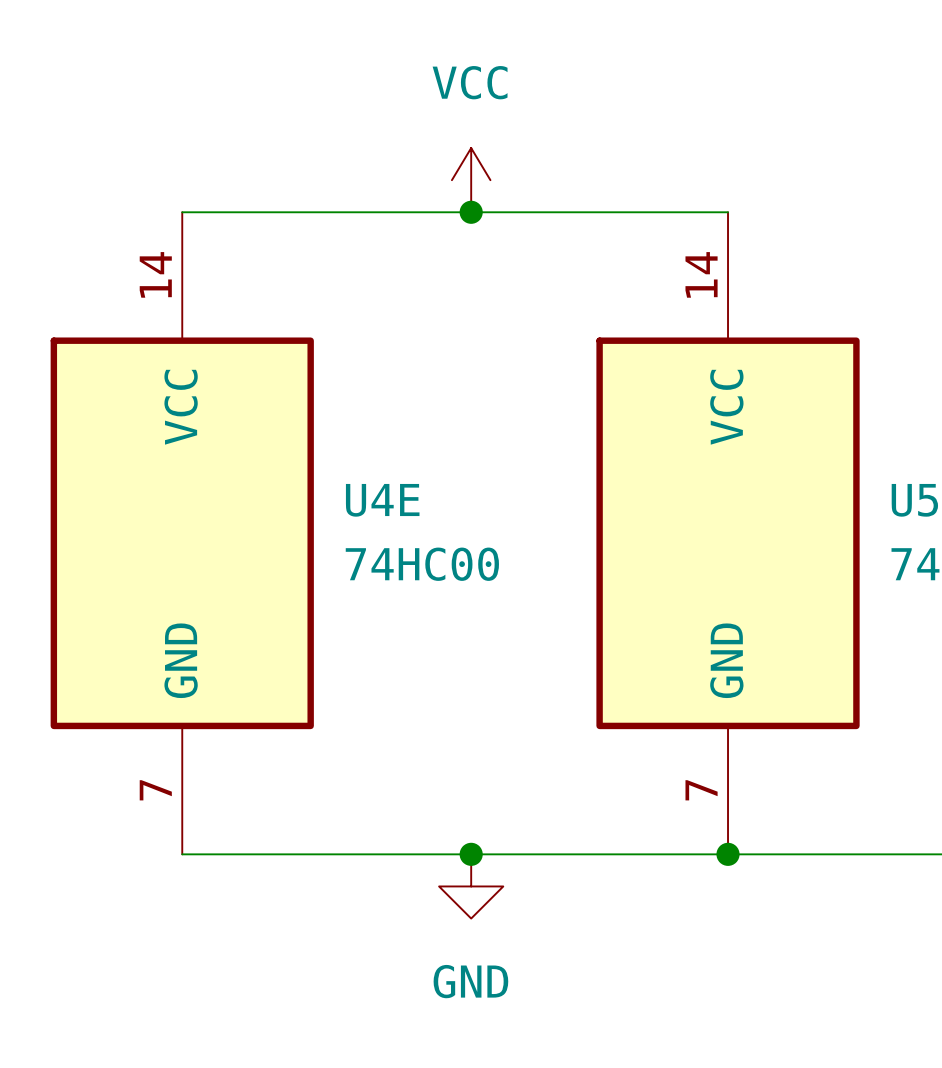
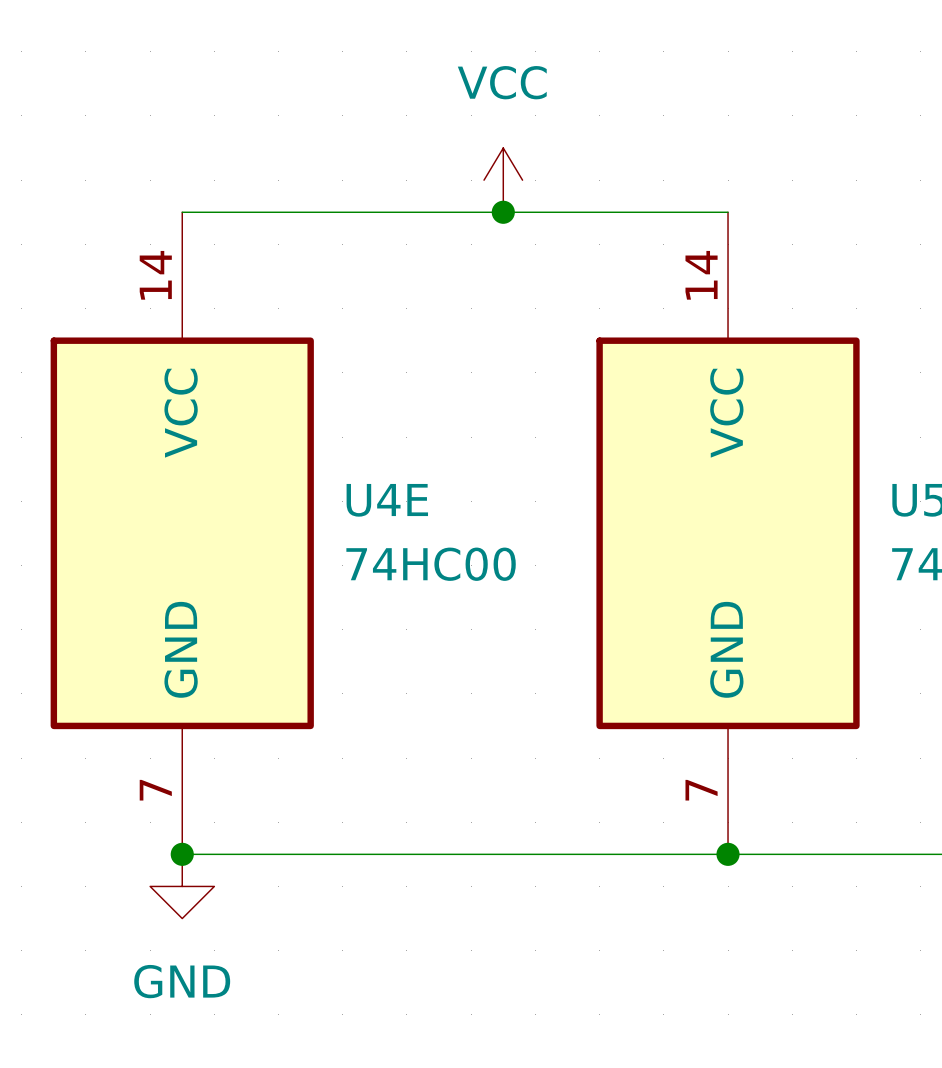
power symbol position: VCC (471, 180) -> VCC (503, 180)
junction position: (471, 212) -> (503, 212)
junction: none -> (182, 854)
junction: (471, 854) -> none
power symbol position: GND (471, 886) -> GND (182, 886)

